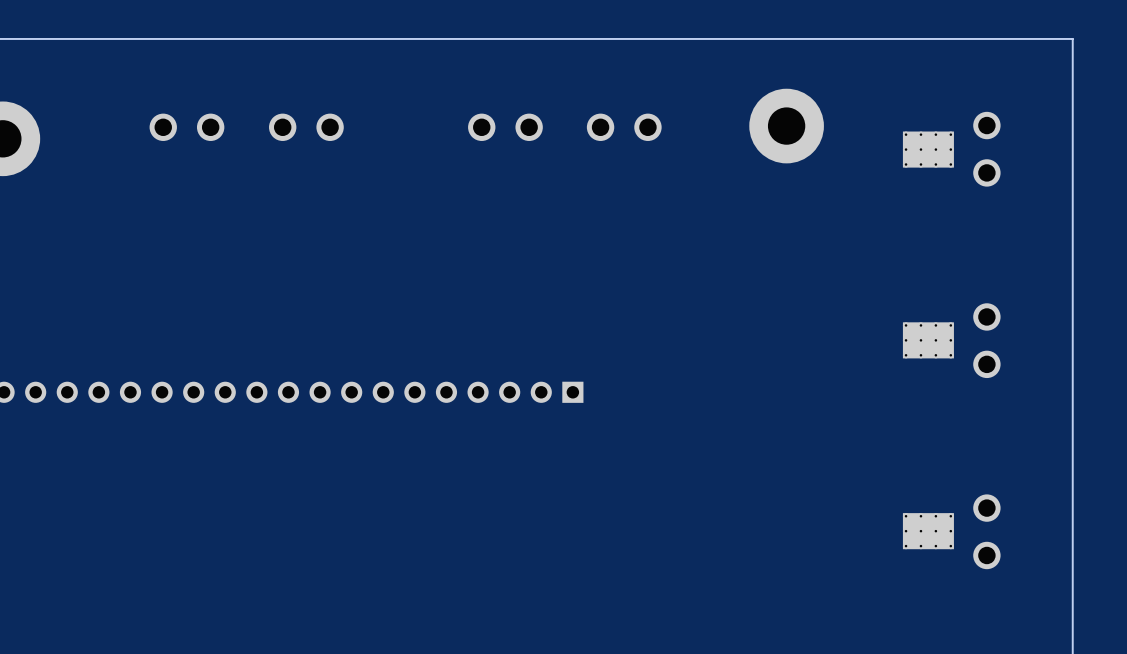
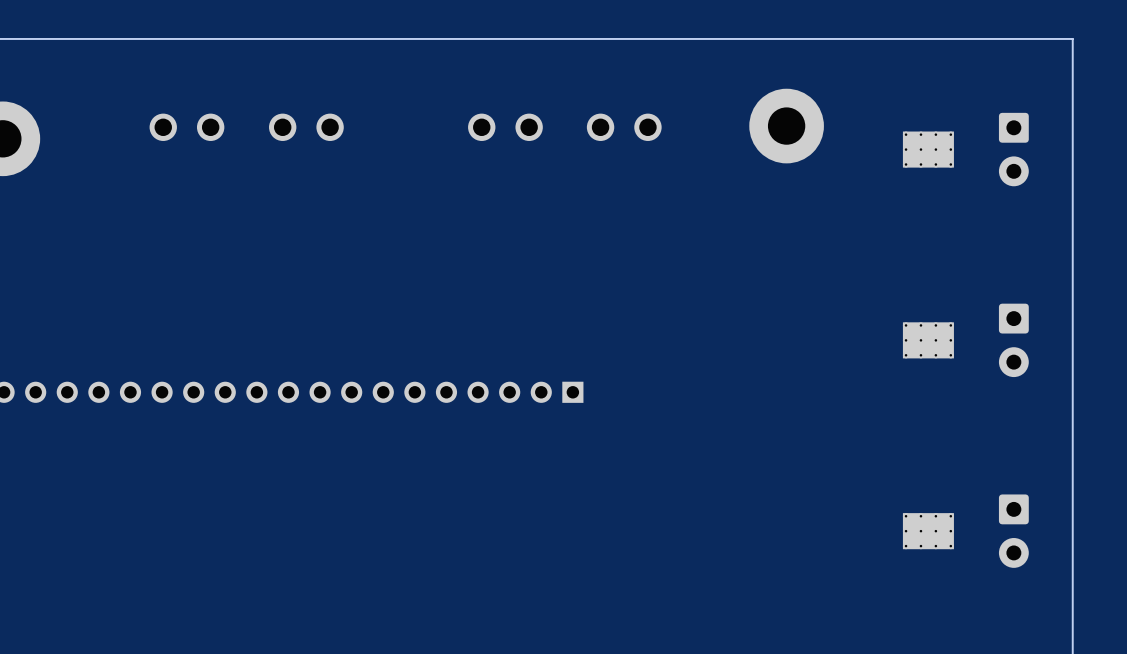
part: (986, 149) -> none
part: none -> (1013, 149)
part: (986, 340) -> none
part: none -> (1013, 340)
part: (986, 531) -> none
part: none -> (1013, 531)

